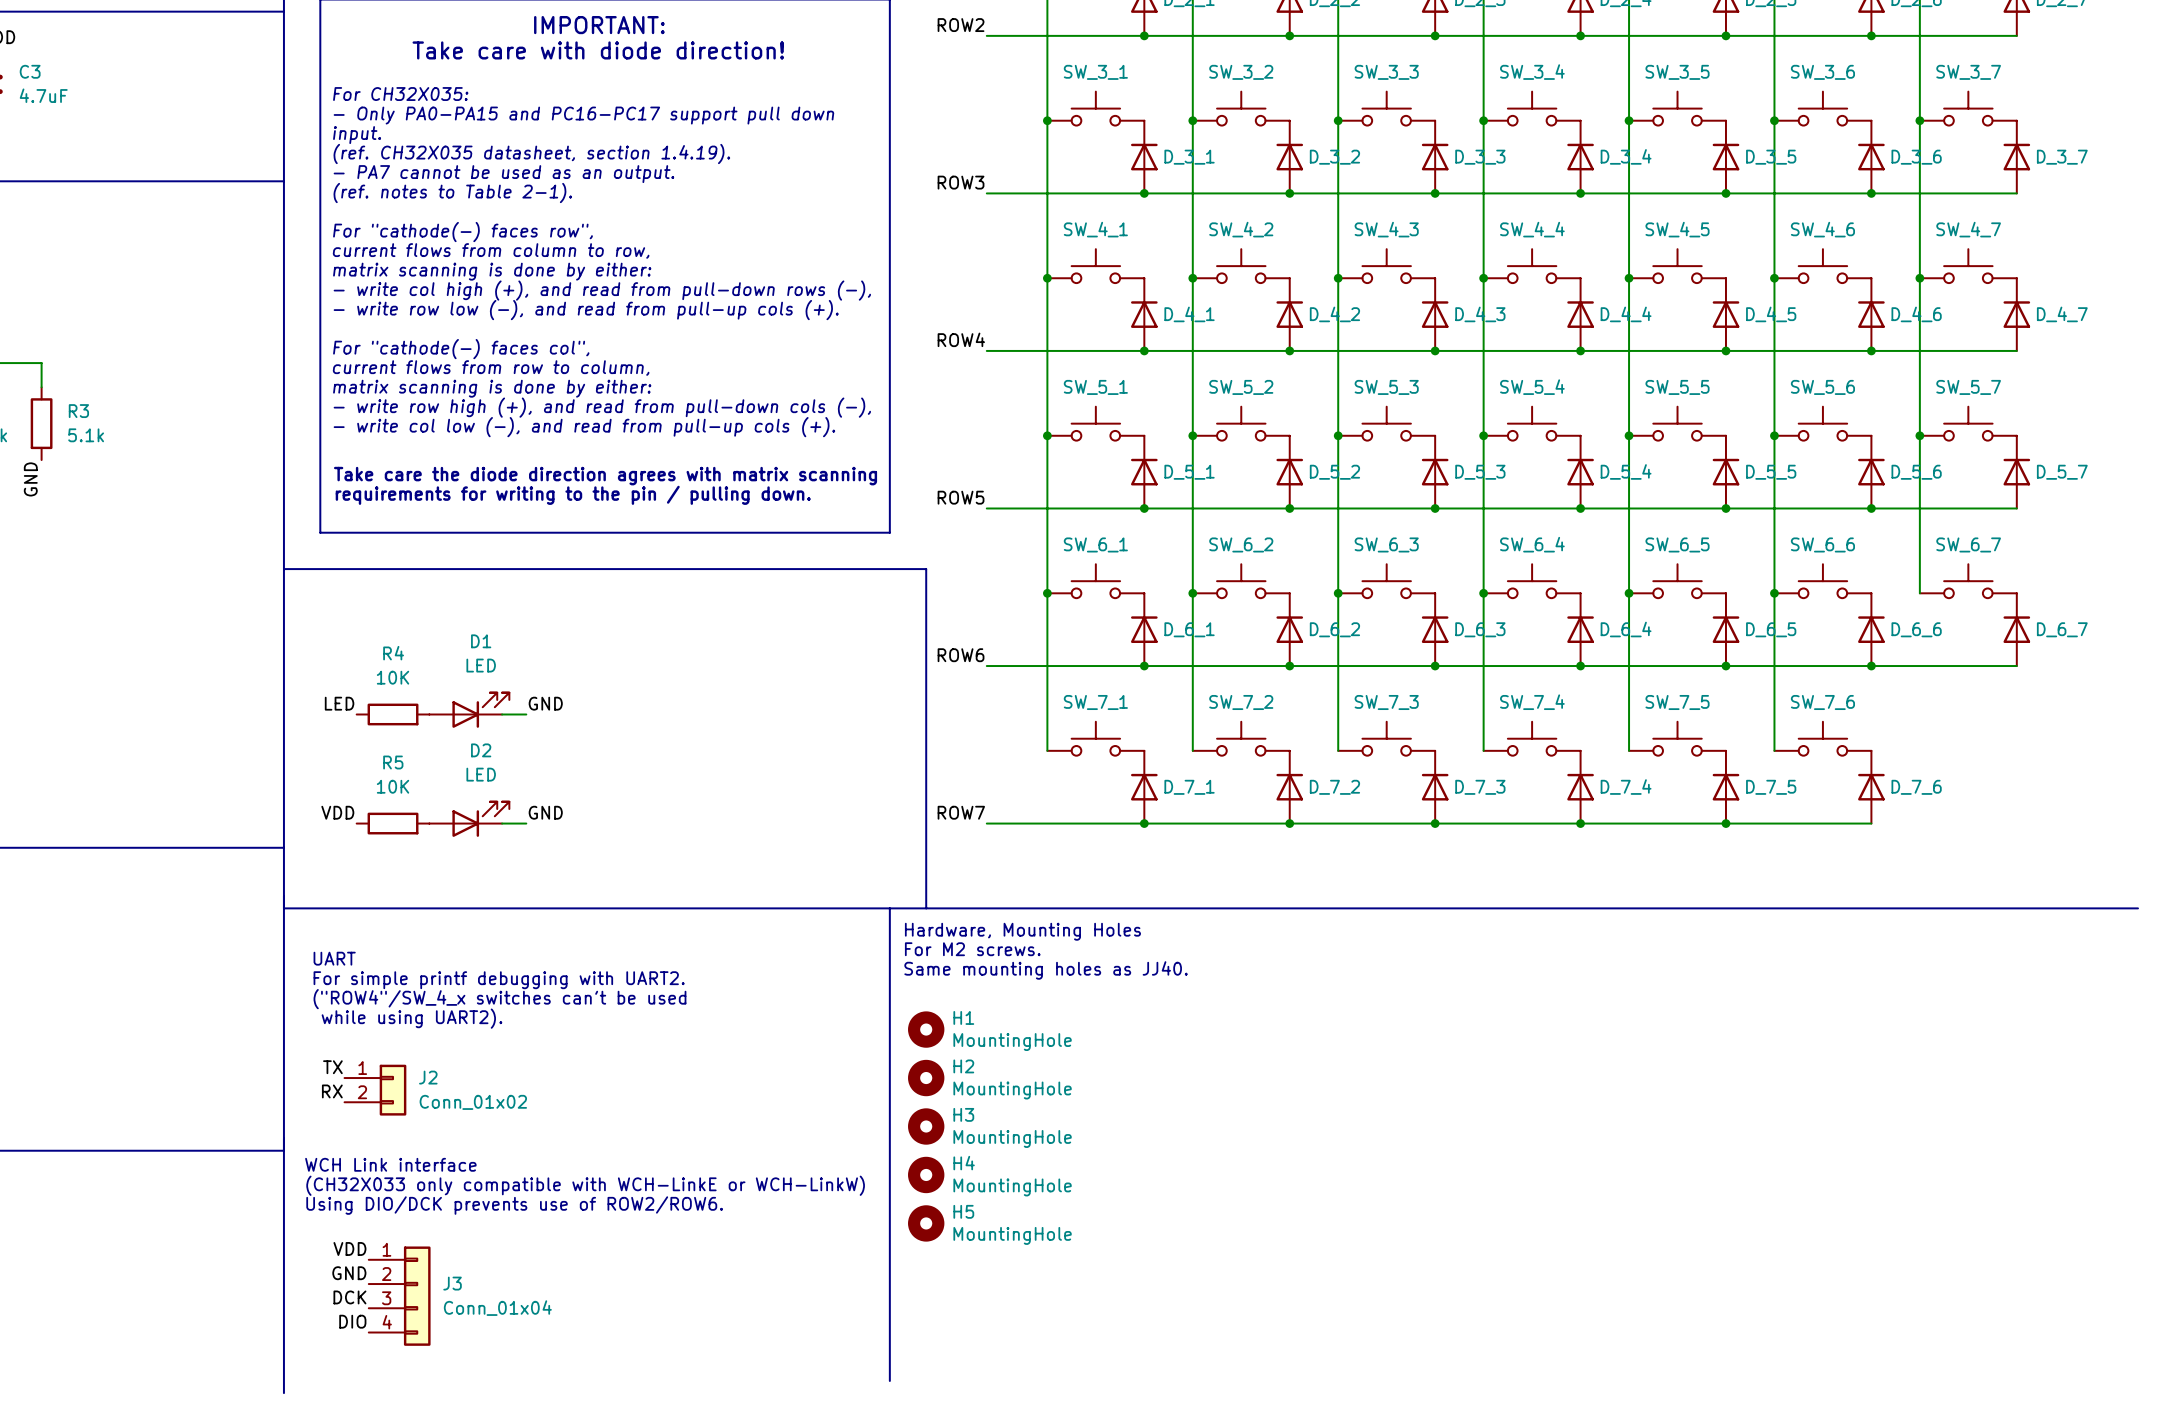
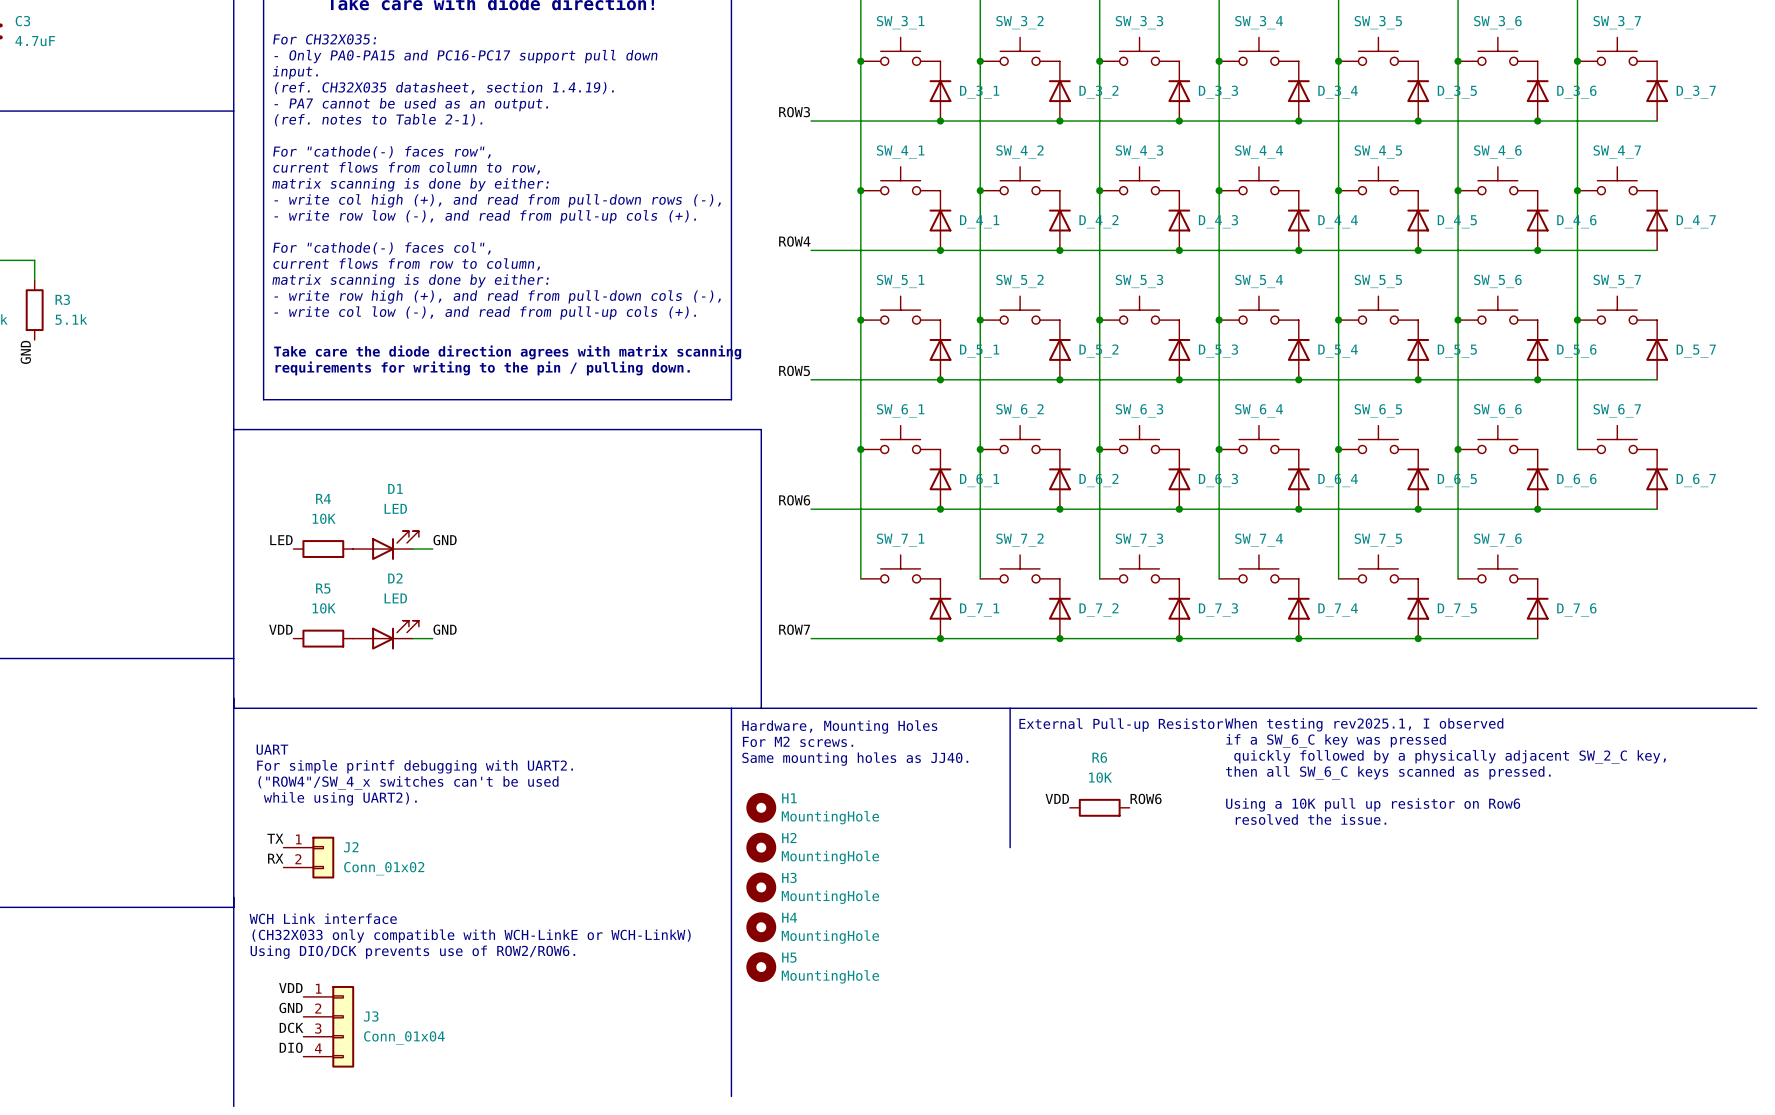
line: none -> (1010, 708) (1010, 847)
text: none -> External Pull-up Resistor (1121, 725)
text: none -> When testing rev2025.1, I observed (1364, 724)
text: none -> if a SW_6_C key was pressed (1336, 740)
text: none -> quickly followed by a physically adjacent SW_2_C key, (1450, 756)
text: none -> then all SW_6_C keys scanned as pressed. (1388, 773)
label: none -> VDD (1057, 798)
label: none -> ROW6 (1146, 798)
text: none -> Using a 10K pull up resistor on Row6 (1373, 804)
R6: none -> 10K (1099, 807)
text: none -> resolved the issue. (1311, 819)

